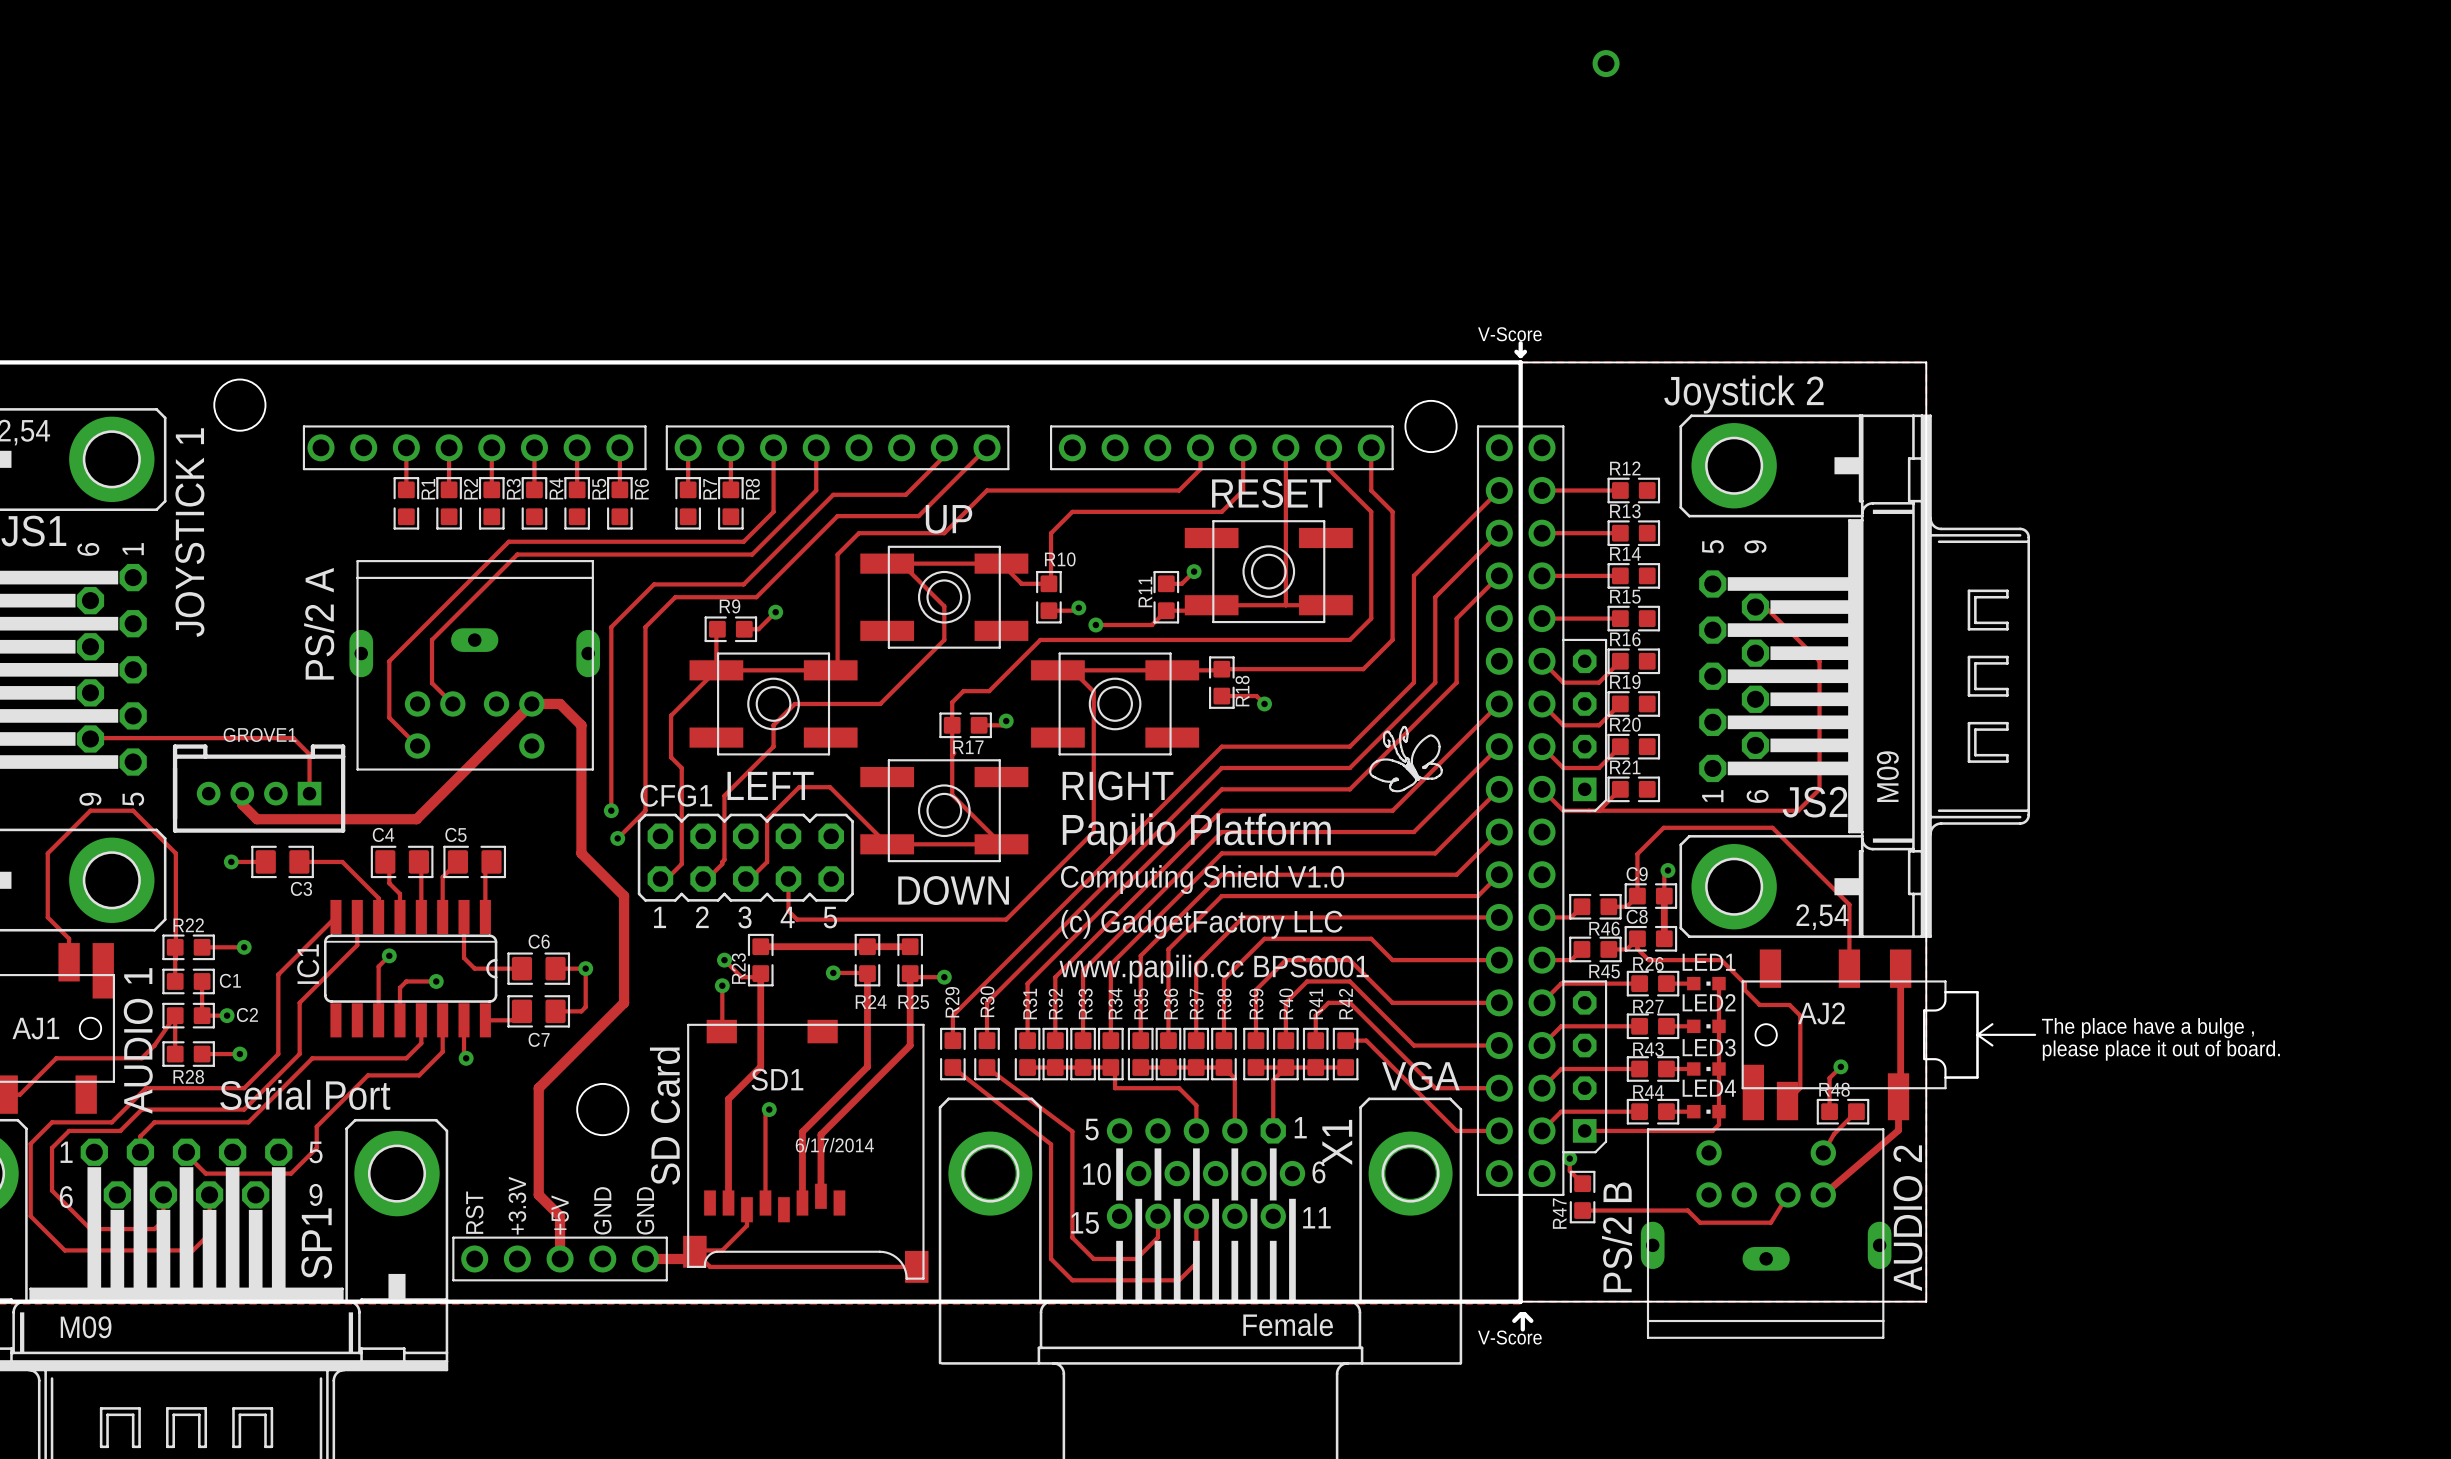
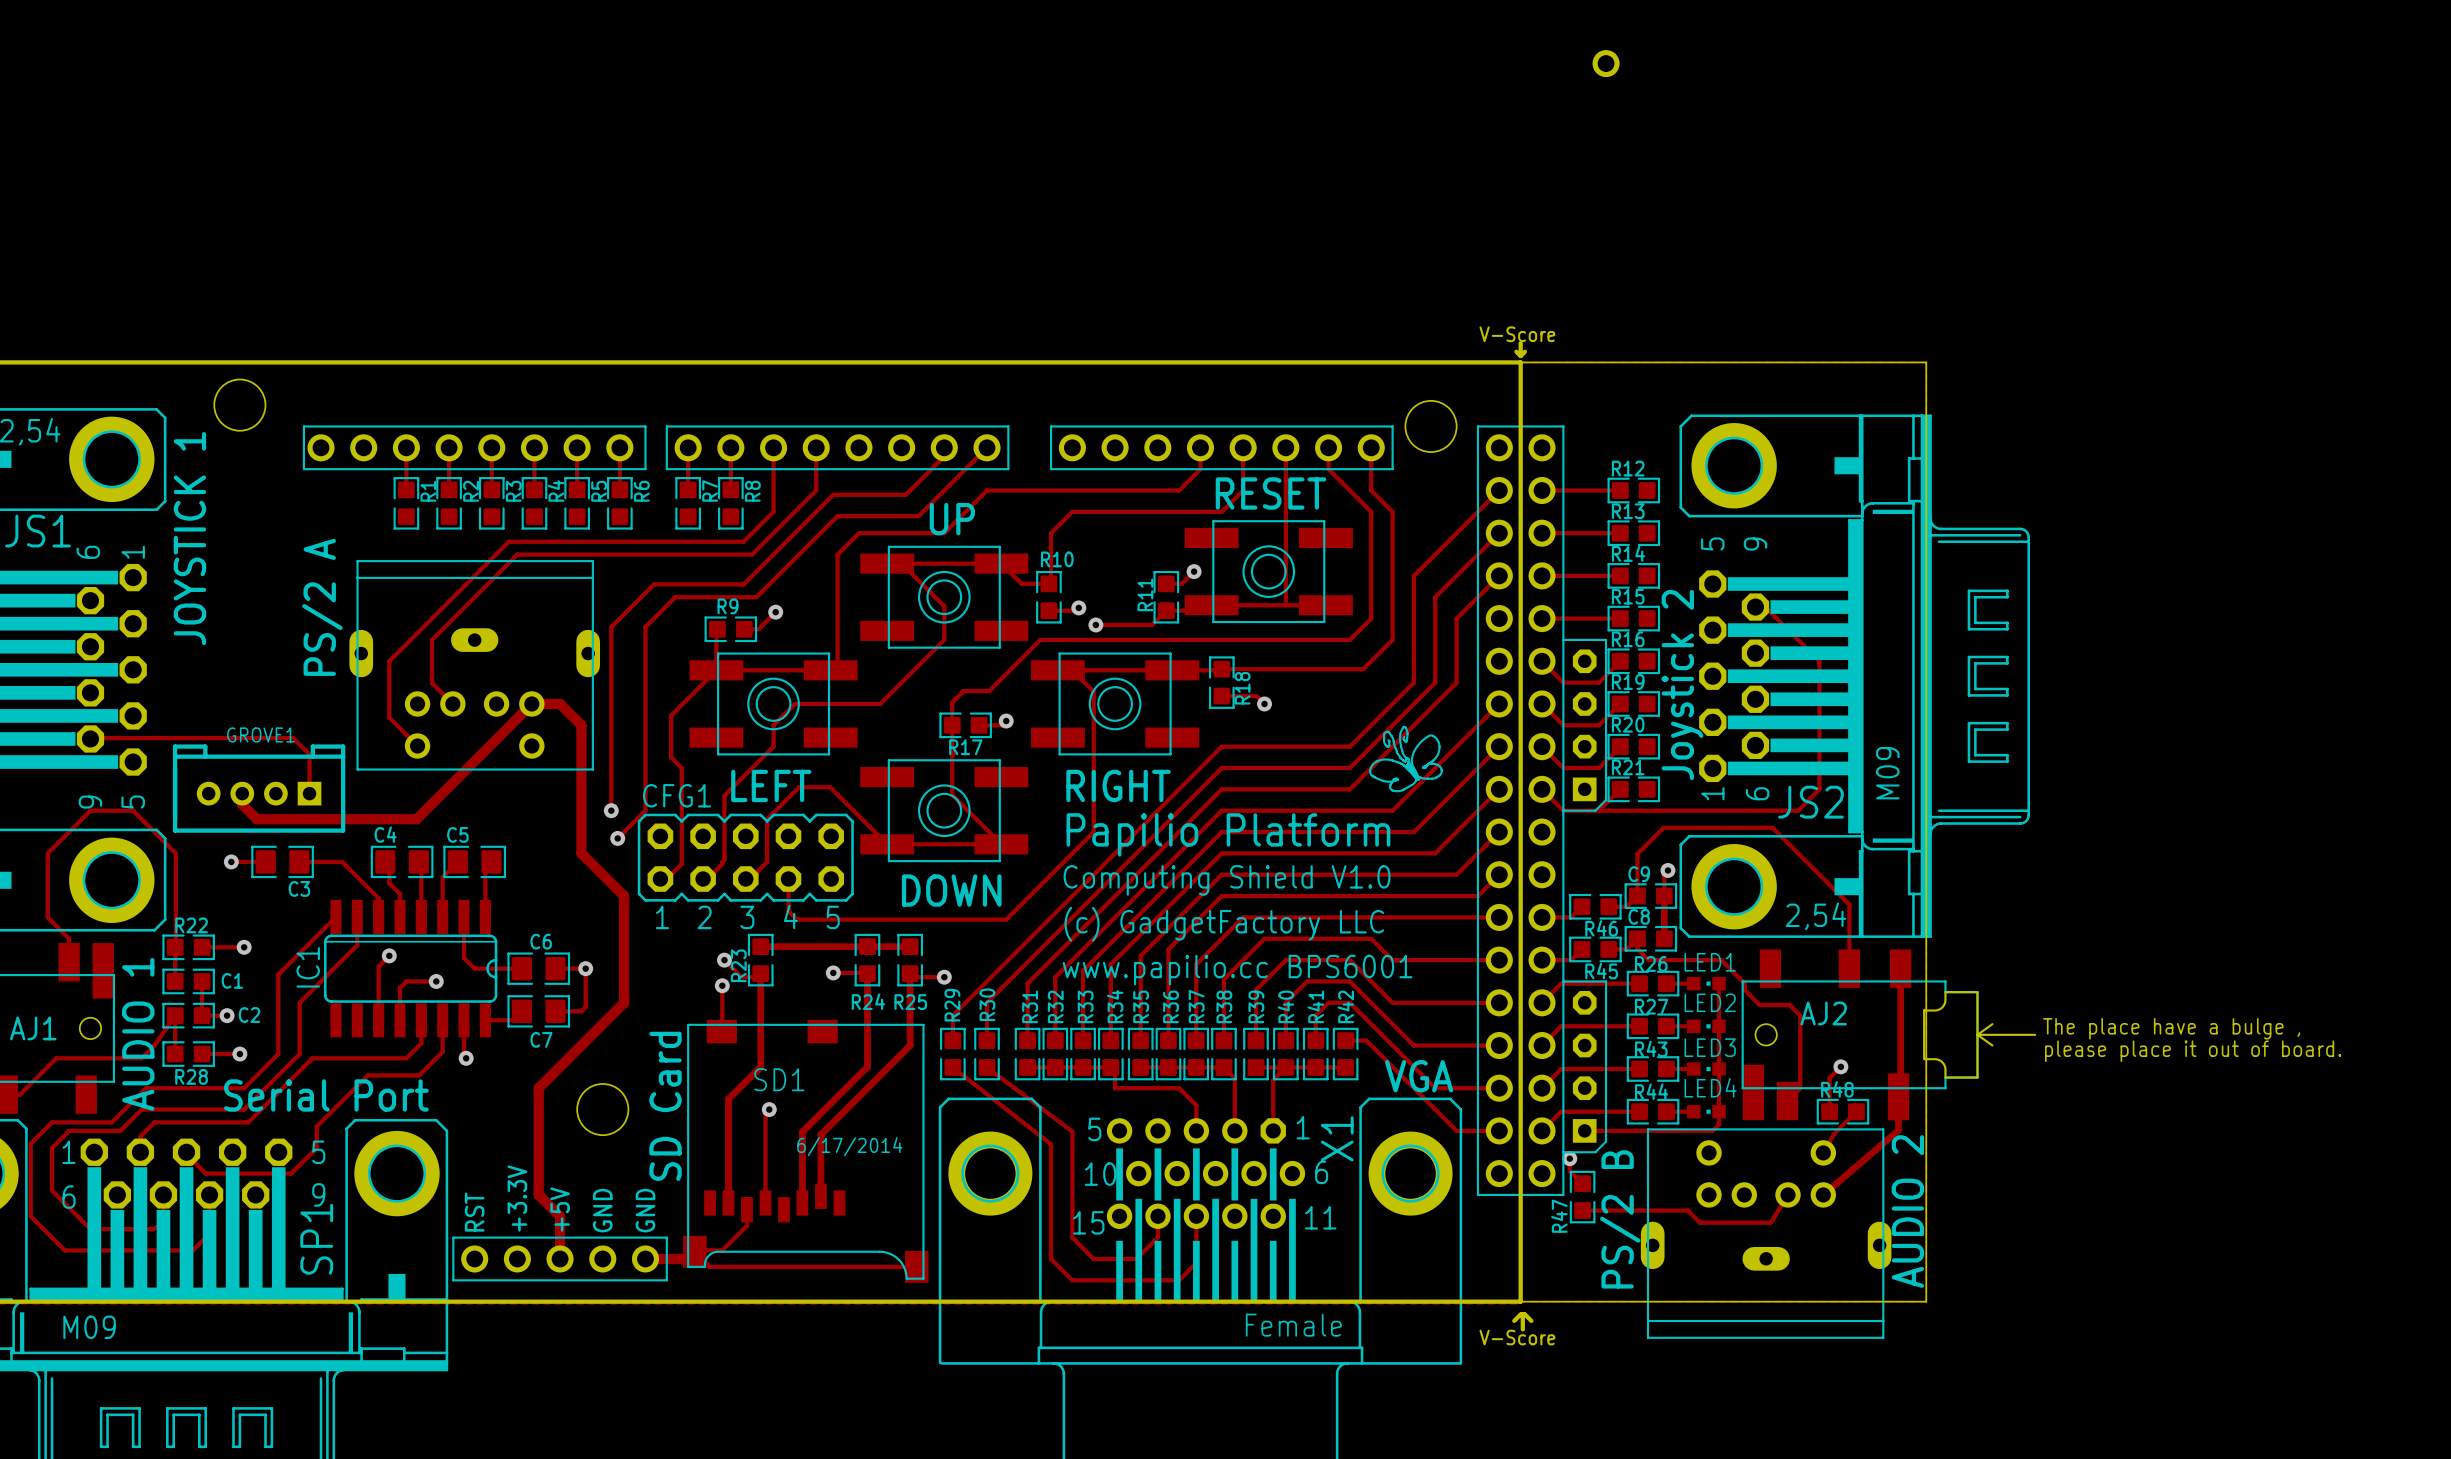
text rotation: 0° (1743, 394) -> 90° counterclockwise (1682, 685)
text position: Joystick 2 (1743, 394) -> Joystick 2 (1682, 685)

